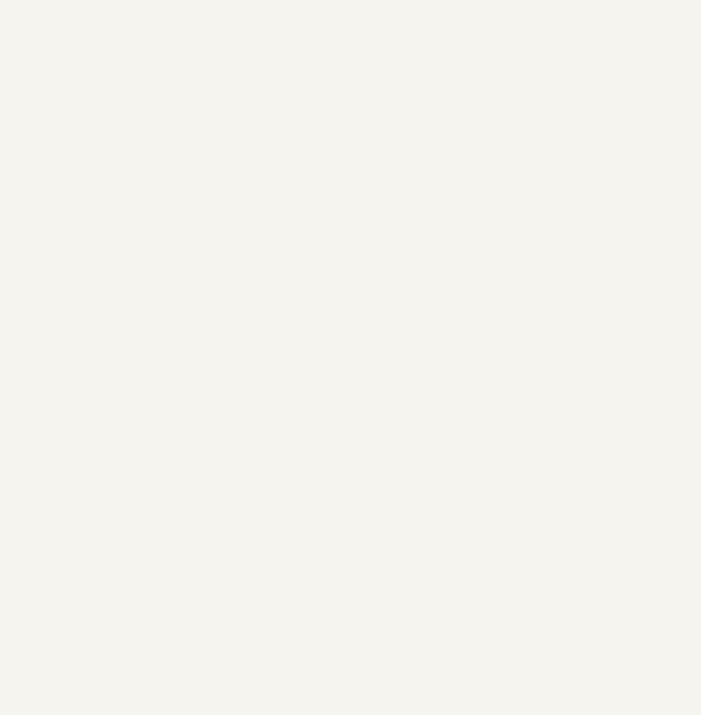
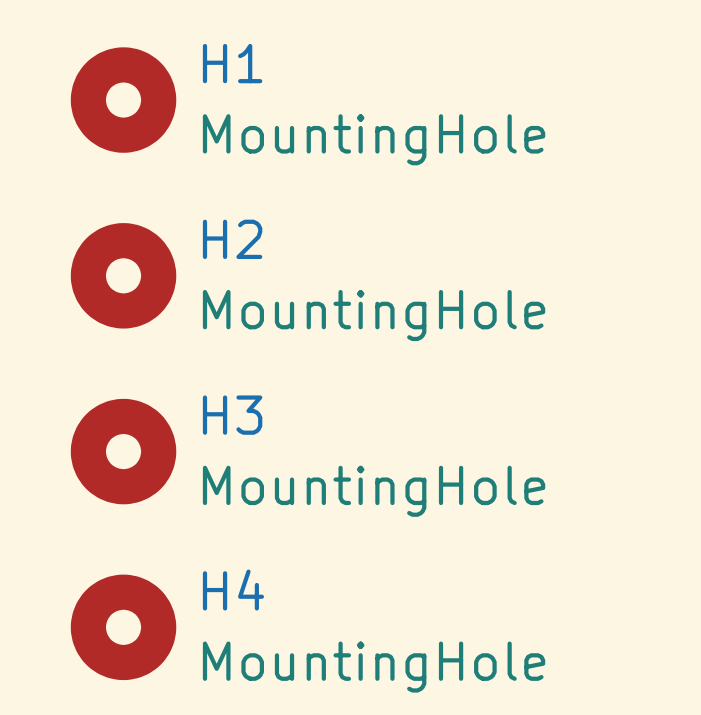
H1: none -> MountingHole (123, 100)
H2: none -> MountingHole (123, 275)
H3: none -> MountingHole (123, 451)
H4: none -> MountingHole (123, 627)

